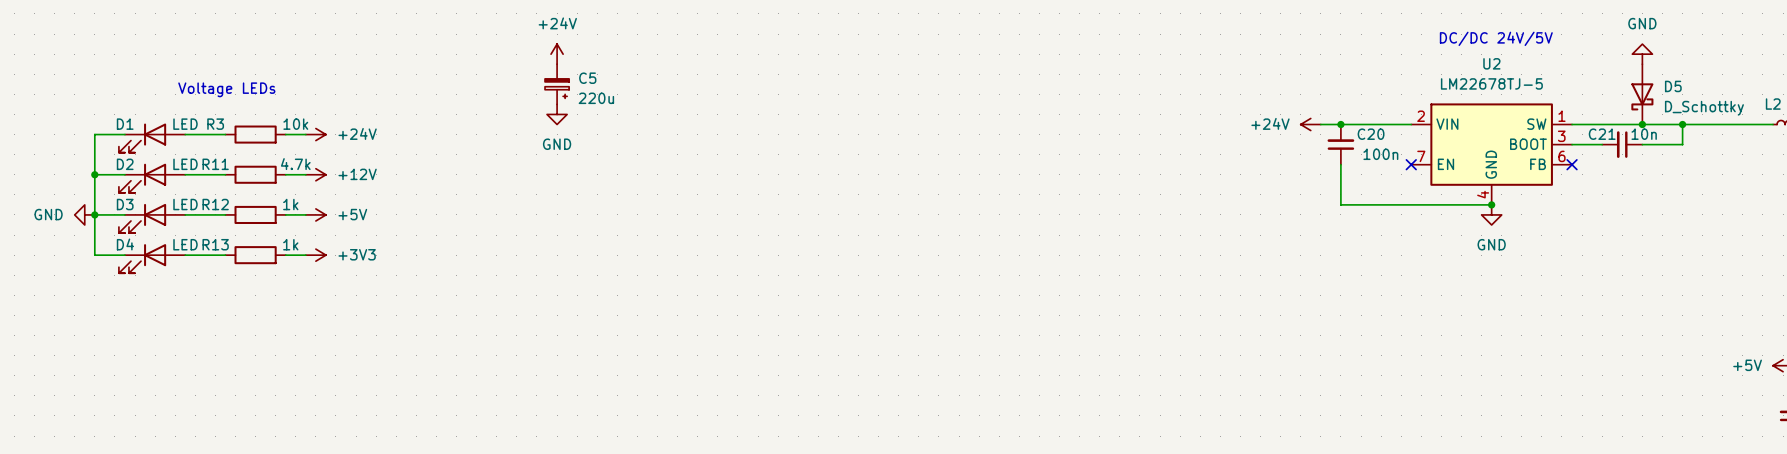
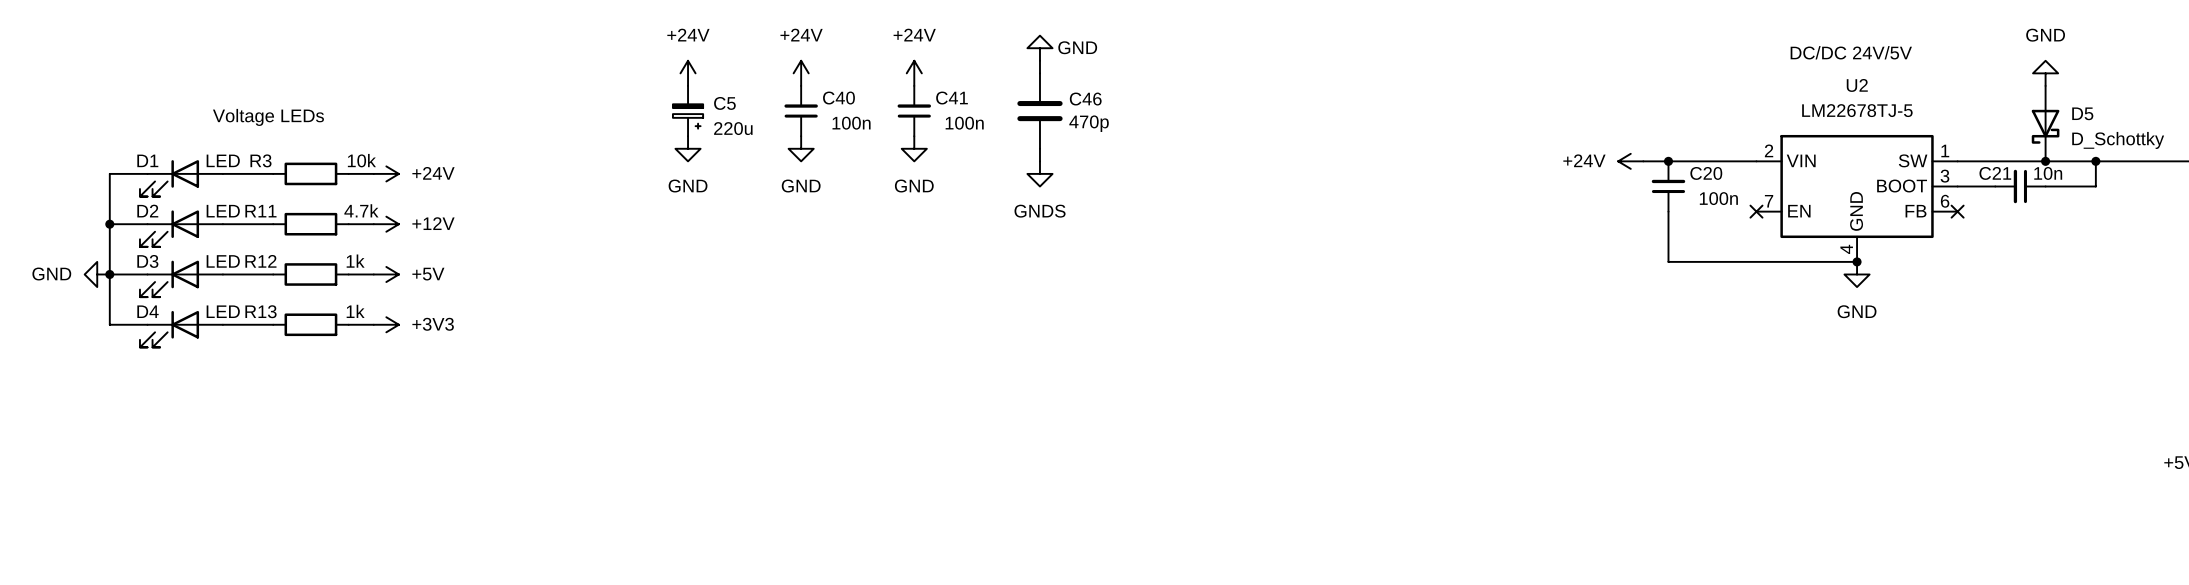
power symbol: none -> GND (1039, 48)
wire: none -> (1039, 60) (1039, 73)
power symbol: none -> +24V (801, 73)
power symbol: none -> +24V (914, 73)
C40: none -> 100n (801, 111)
C41: none -> 100n (914, 111)
C46: none -> 470p (1039, 111)
power symbol: none -> GND (801, 148)
power symbol: none -> GND (914, 148)
wire: none -> (1039, 148) (1039, 161)
power symbol: none -> GNDS (1039, 173)

